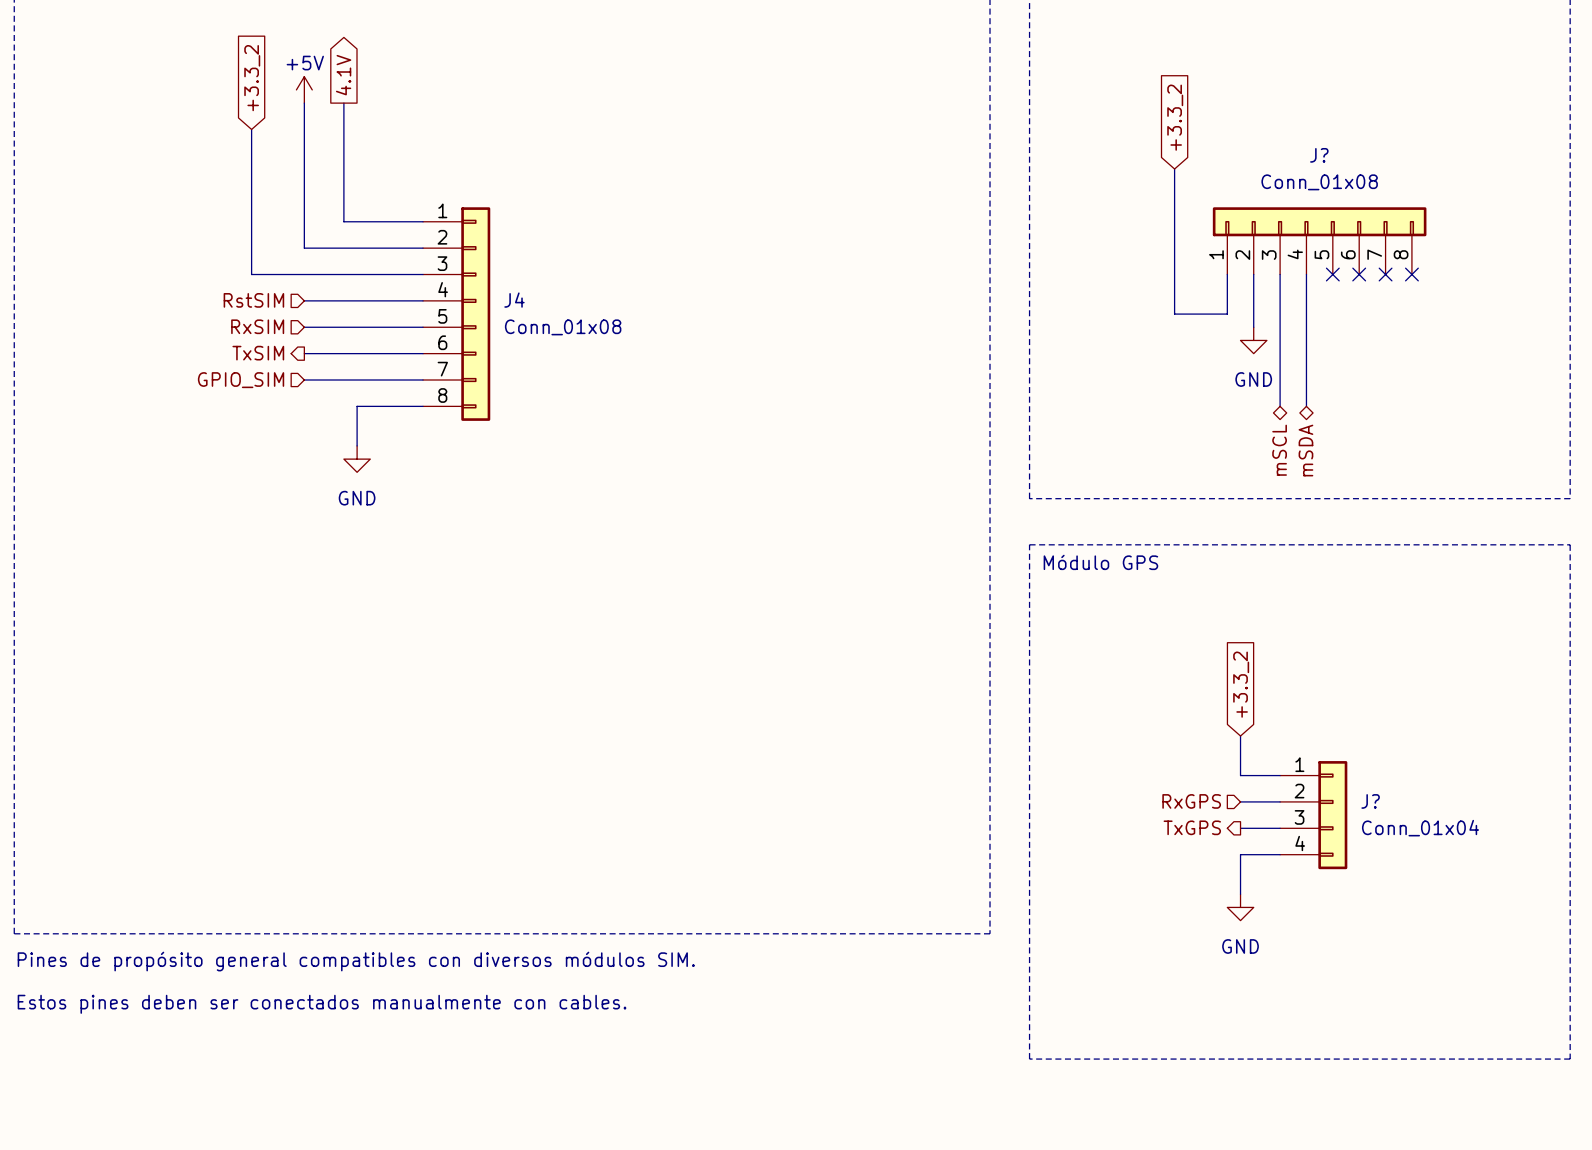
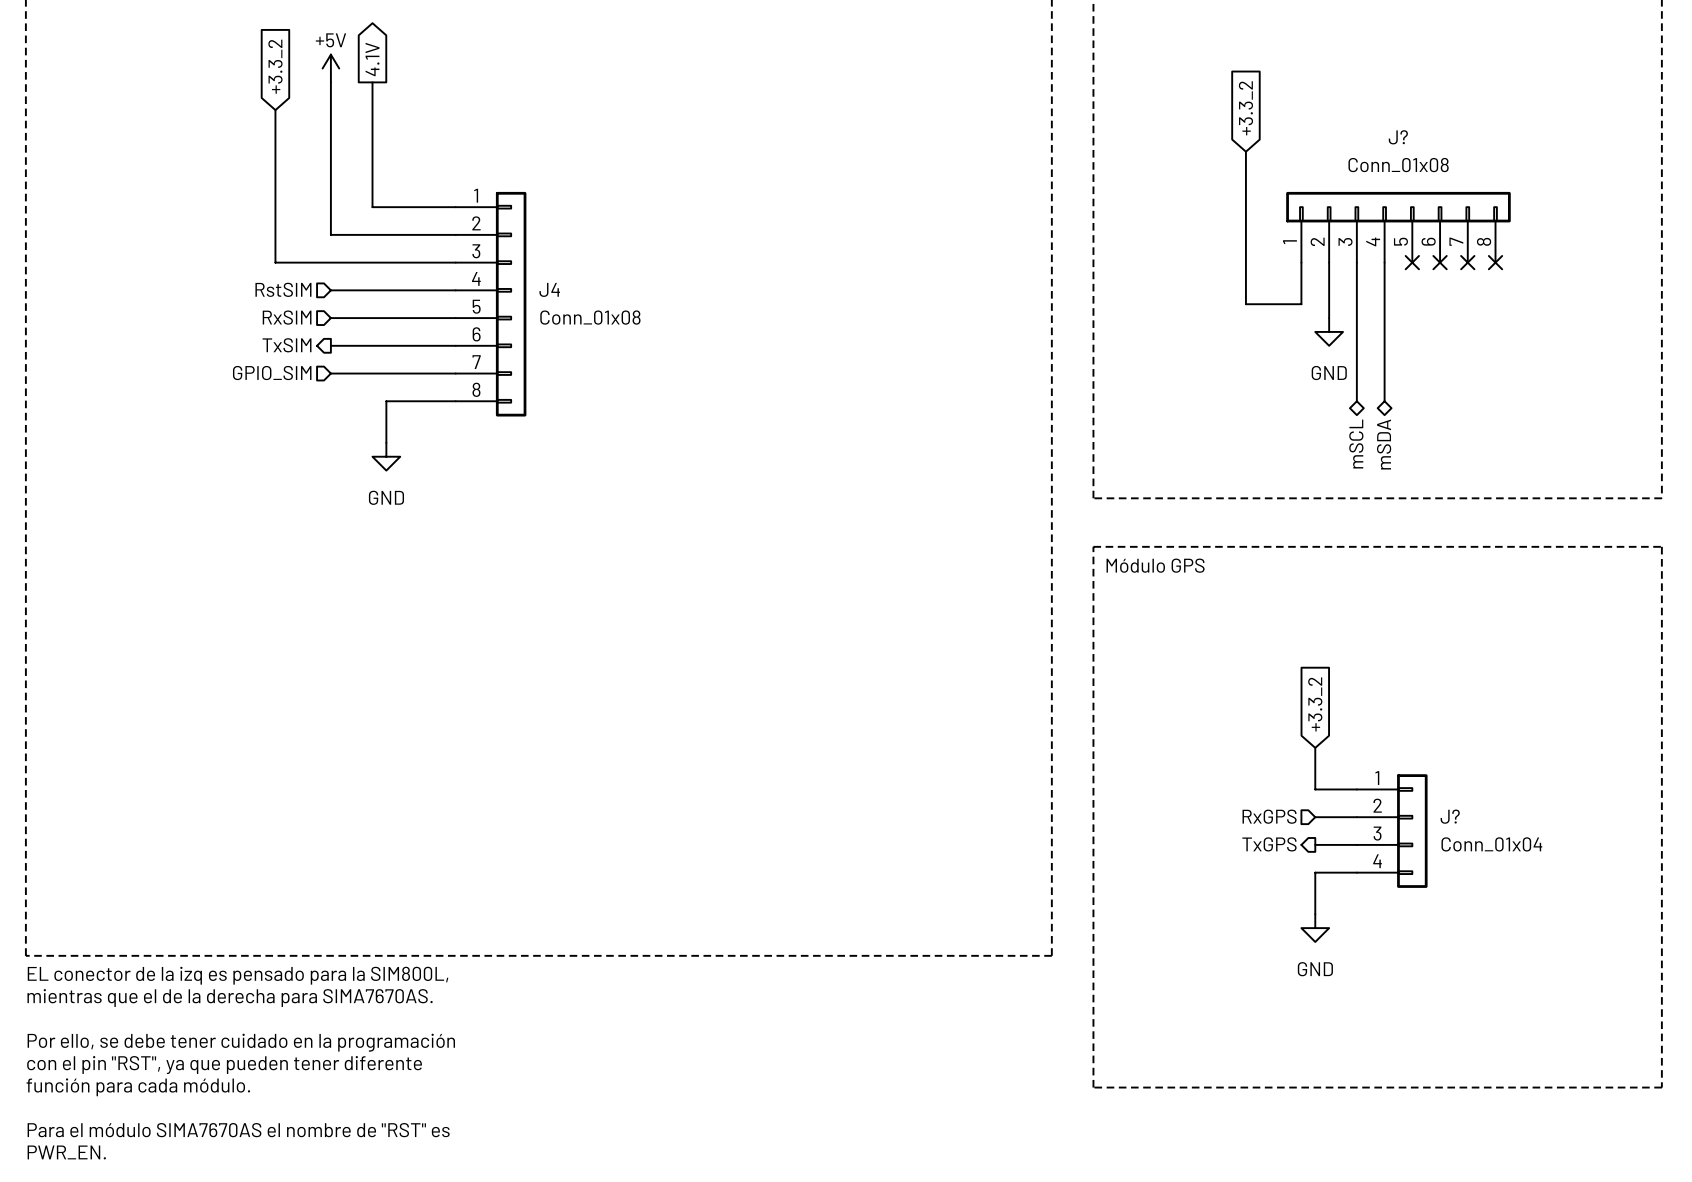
text: none -> EL conector de la izq es pensado para la SIM800L, (238, 975)
text: Pines de propósito general compatibles con diversos módulos SIM. (356, 961) -> none
text: none -> mientras que el de la derecha para SIMA7670AS. (230, 998)
text: Estos pines deben ser conectados manualmente con cables. (322, 1004) -> none
text: none -> Por ello, se debe tener cuidado en la programación (241, 1042)
text: none -> con el pin "RST", ya que pueden tener diferente (224, 1065)
text: none -> función para cada módulo. (138, 1087)
text: none -> Para el módulo SIMA7670AS el nombre de "RST" es (238, 1130)
text: none -> PWR_EN. (66, 1152)

